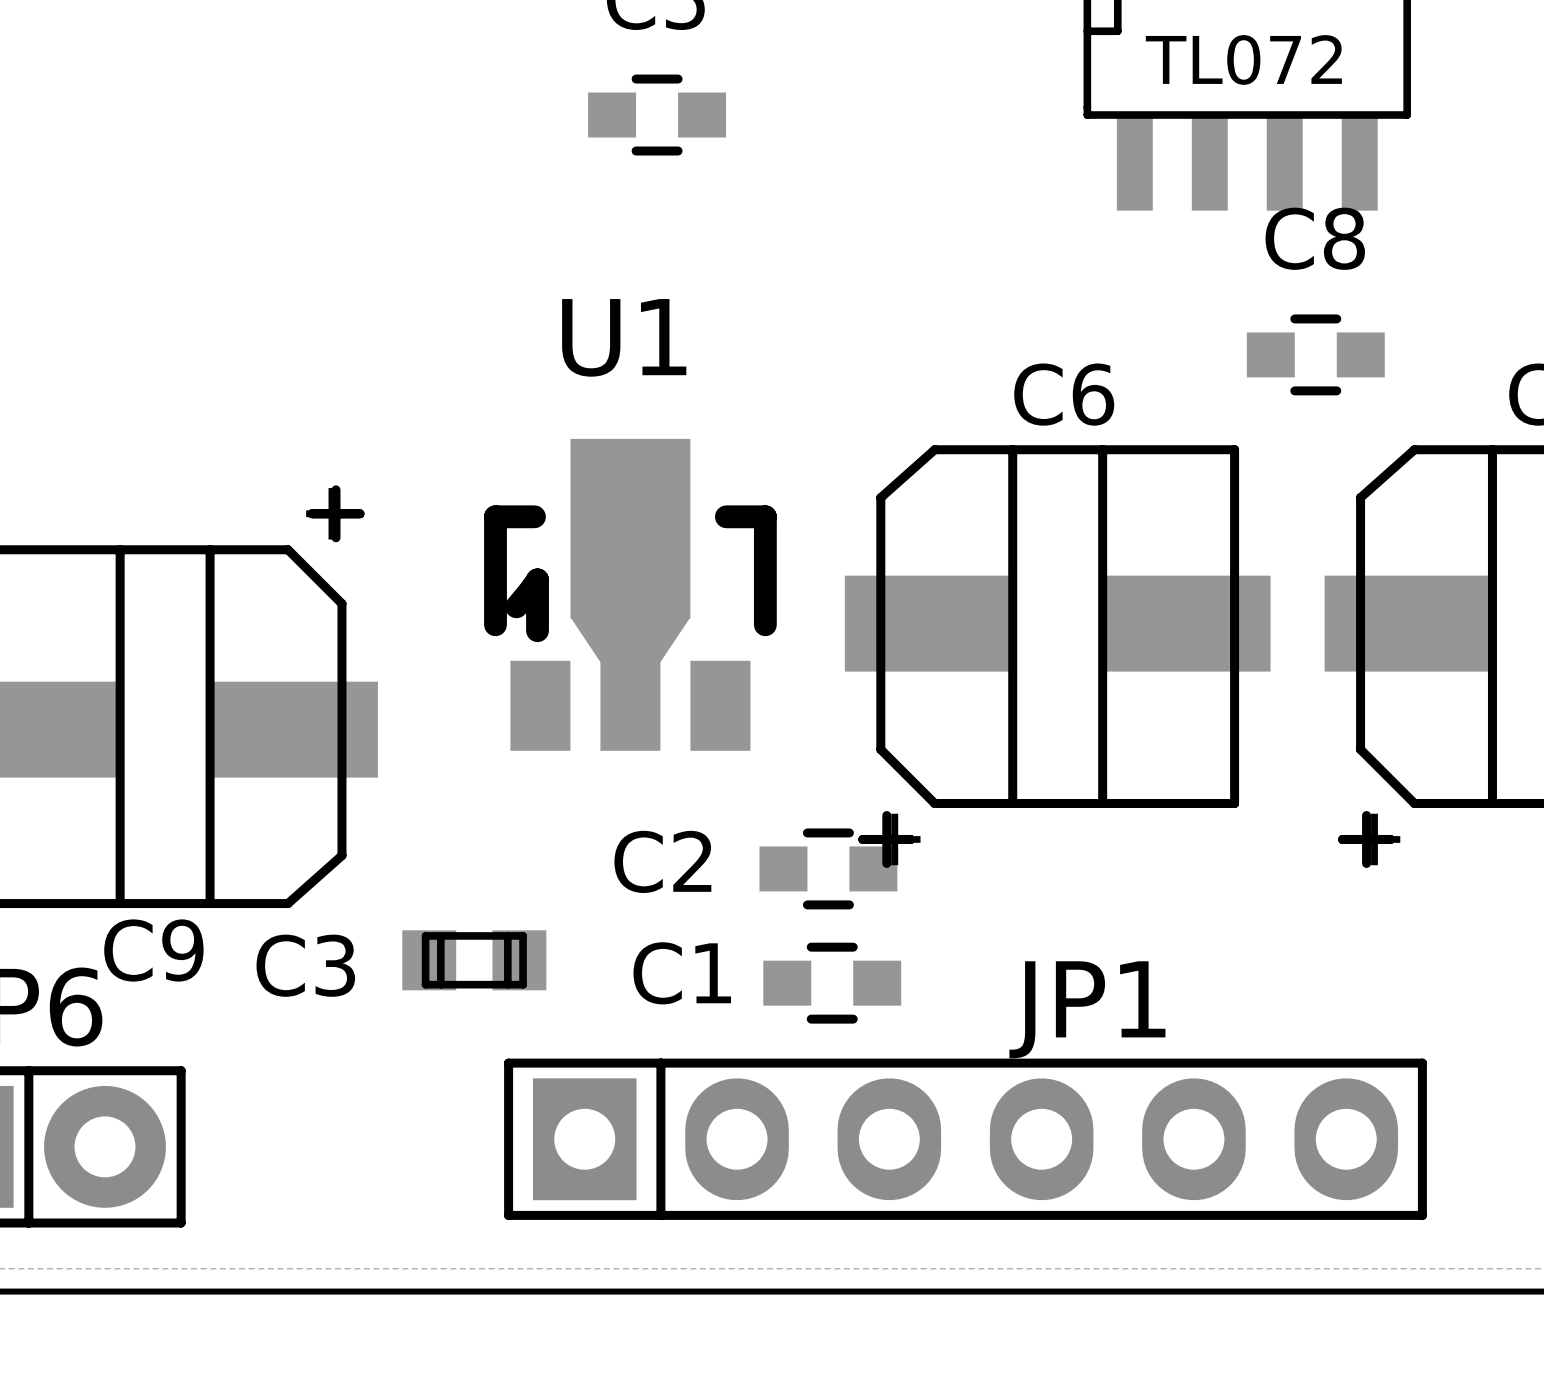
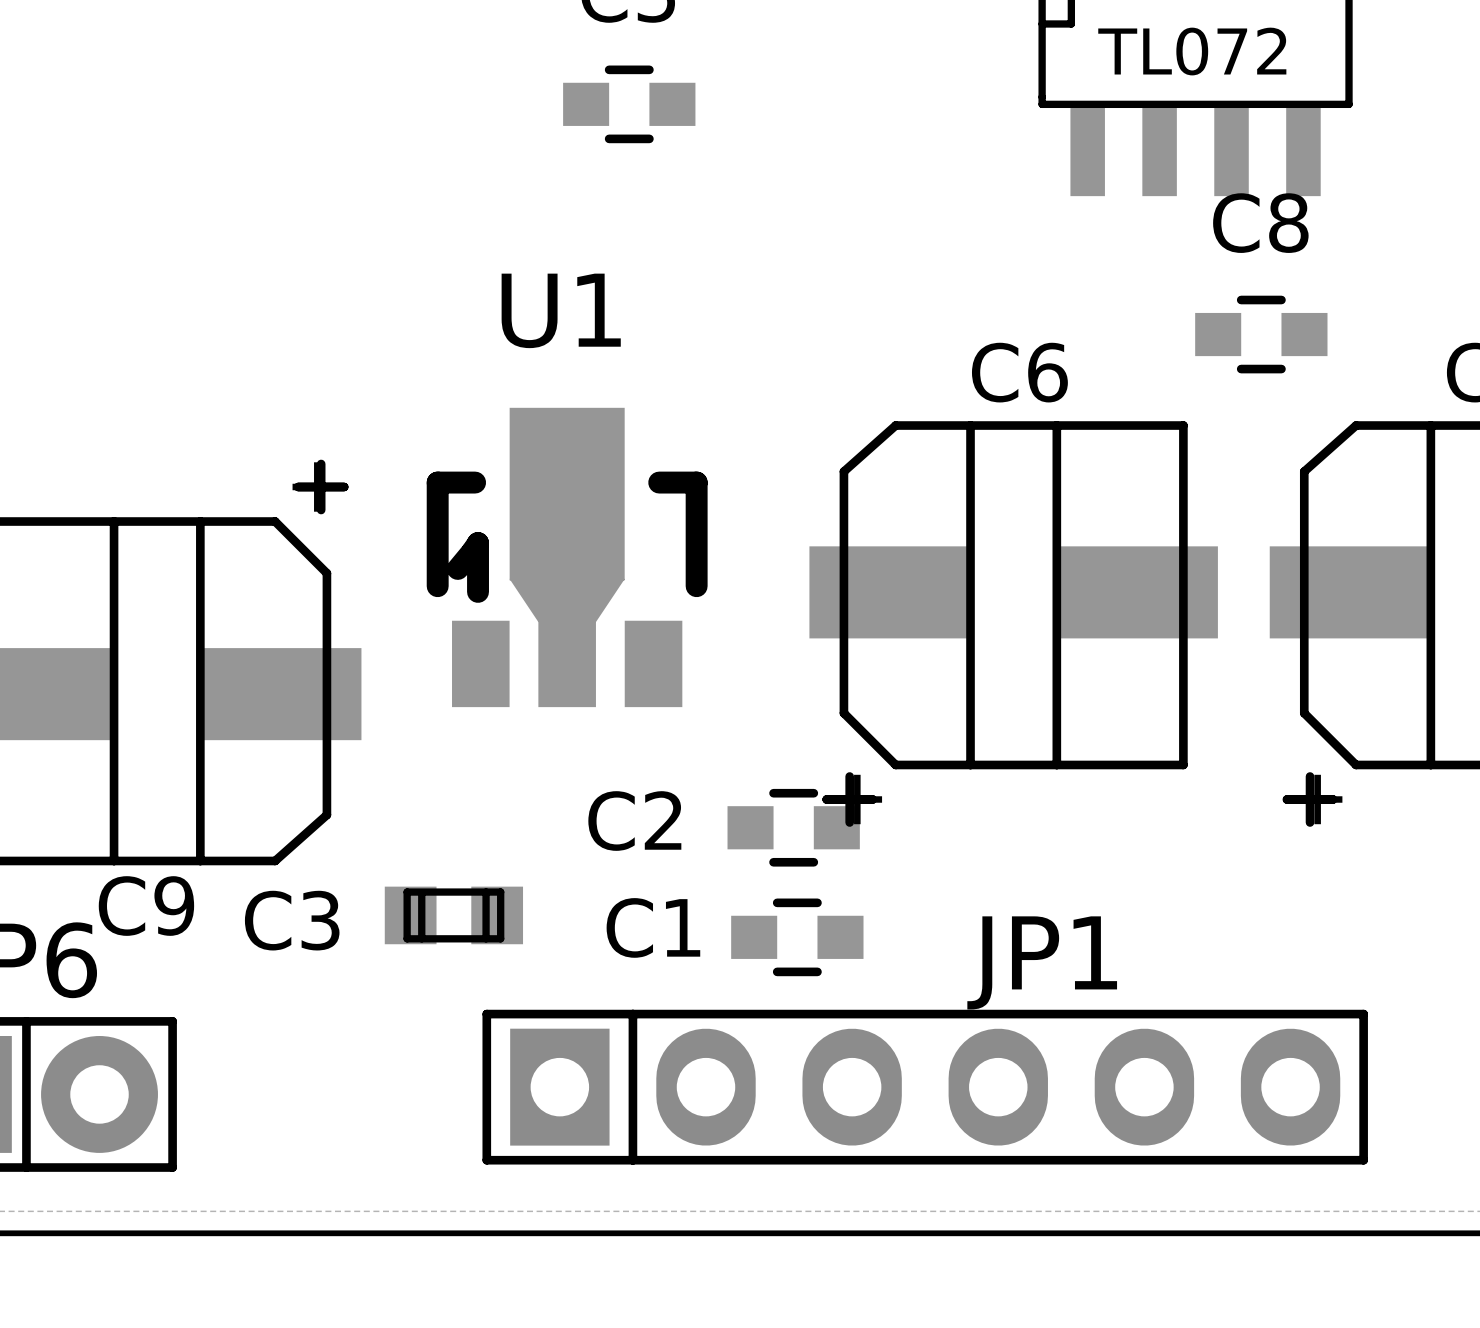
U1 position: (630, 594) -> (567, 557)

